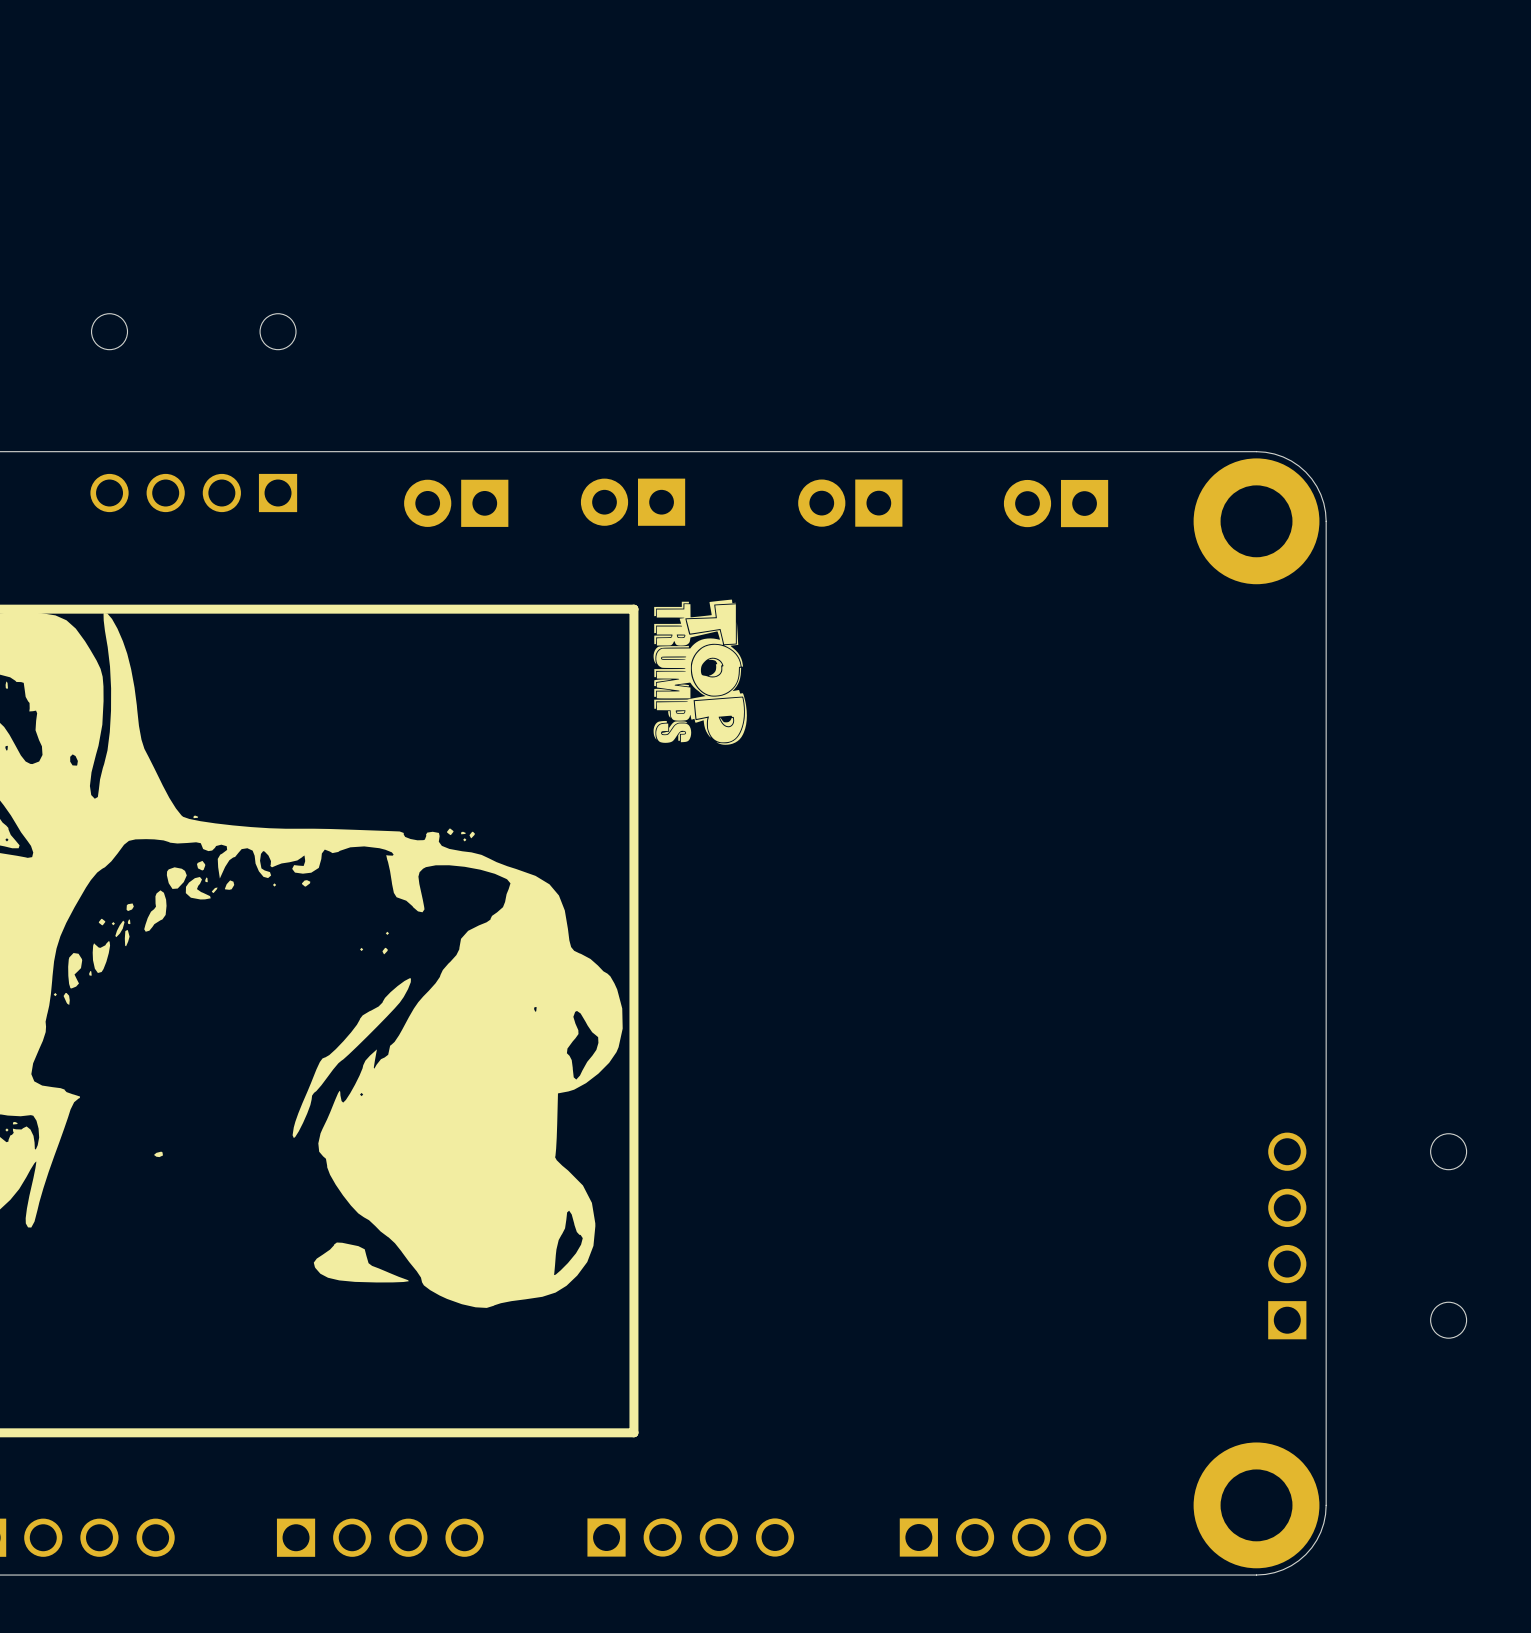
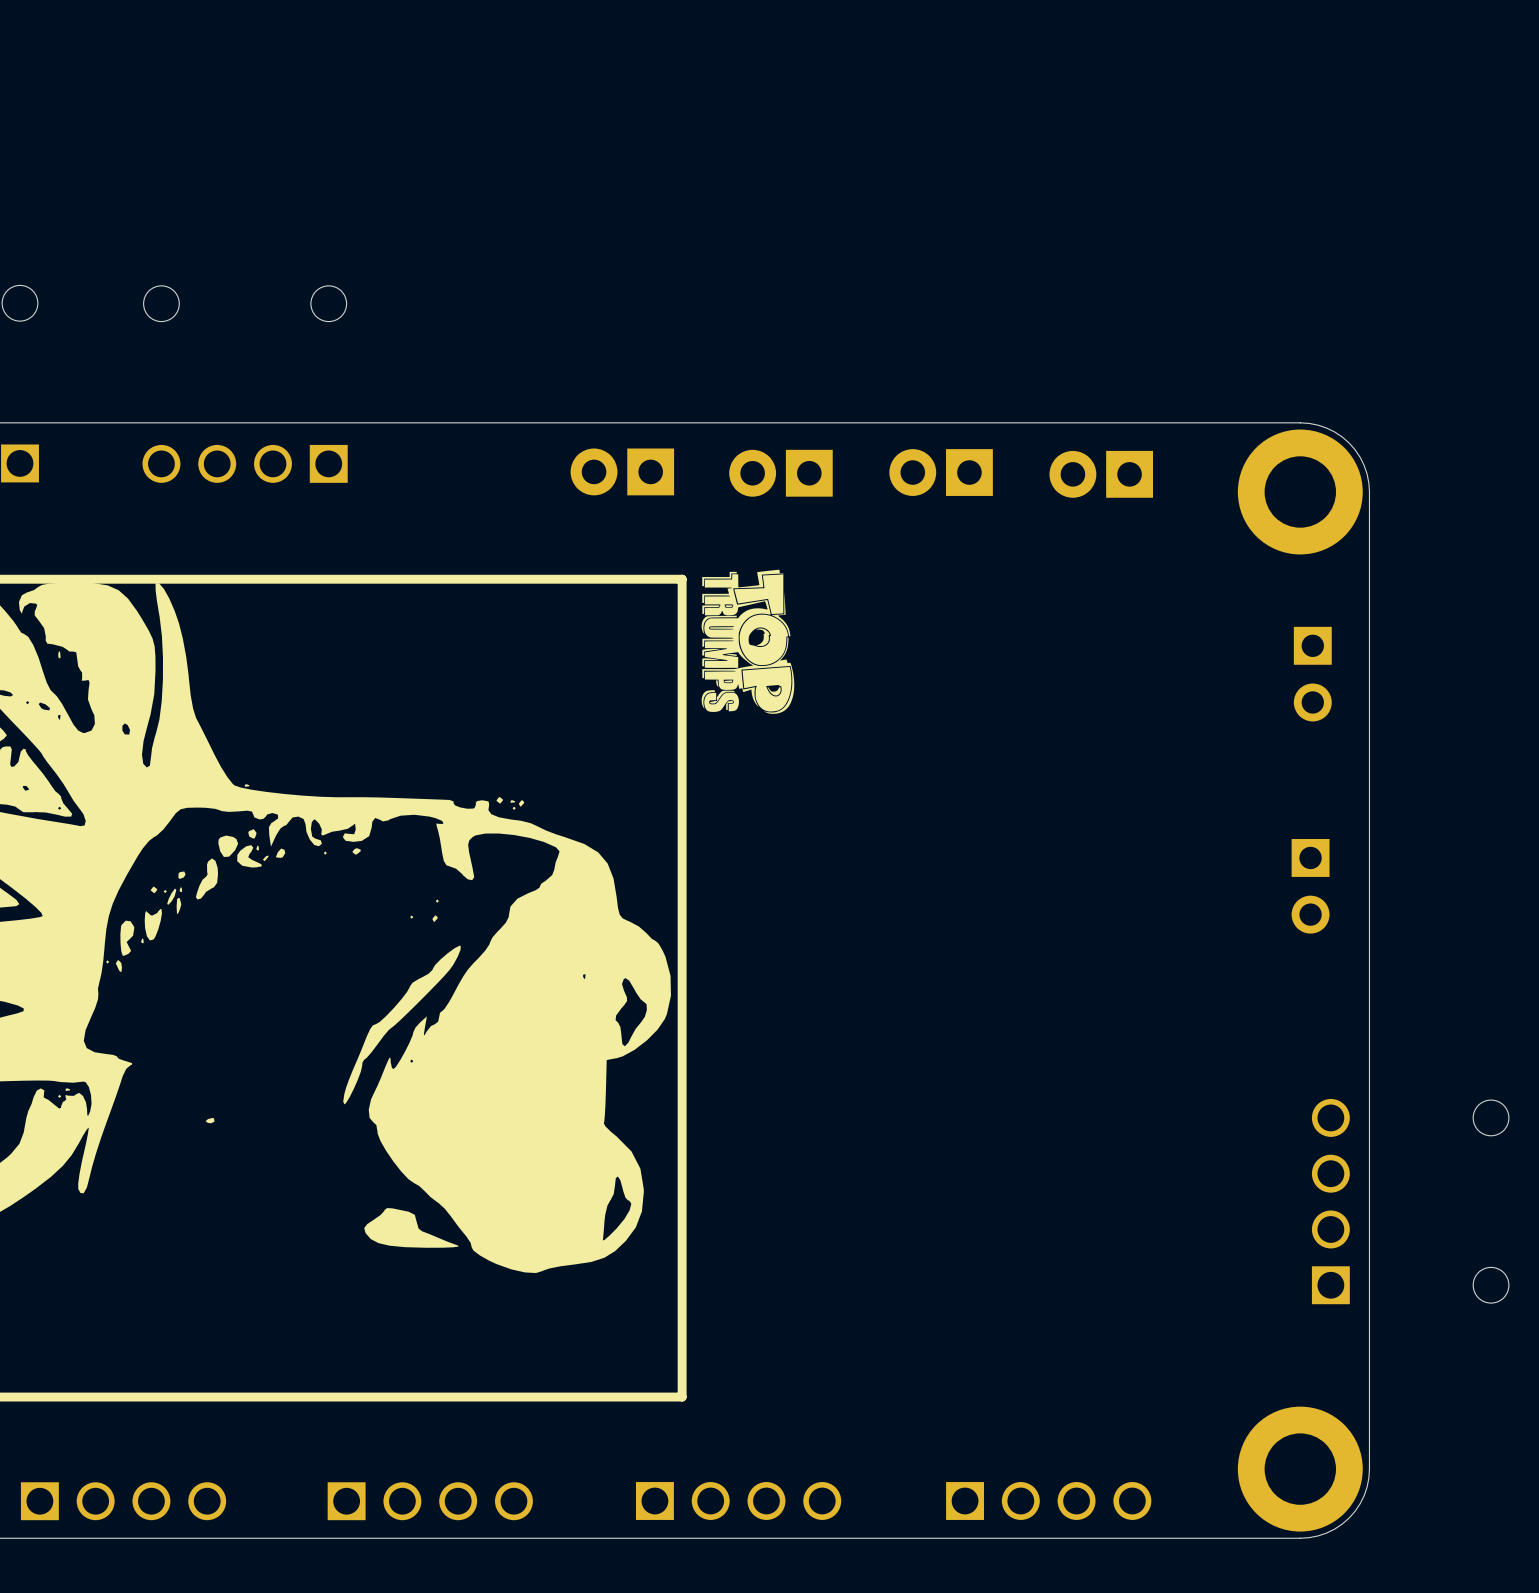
part: none -> (622, 471)
part: (633, 502) -> none
part: none -> (780, 473)
part: (456, 503) -> none
part position: (850, 503) -> (941, 472)
part: none -> (1312, 674)
part: none -> (1310, 886)

